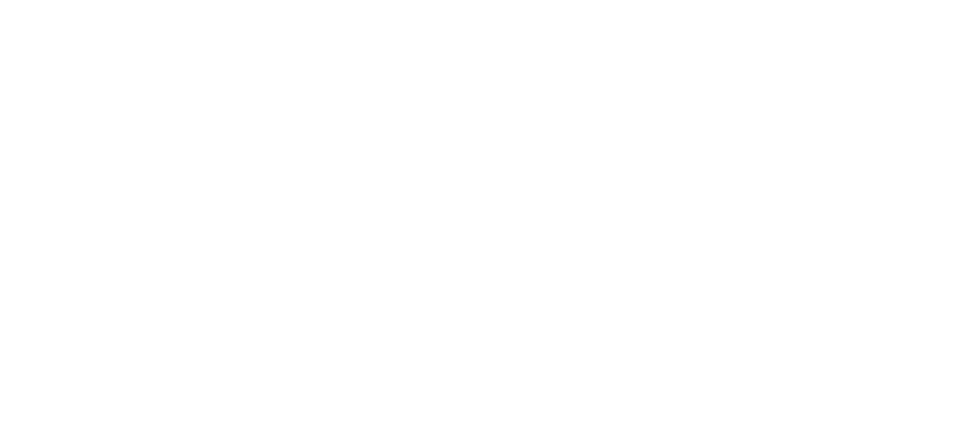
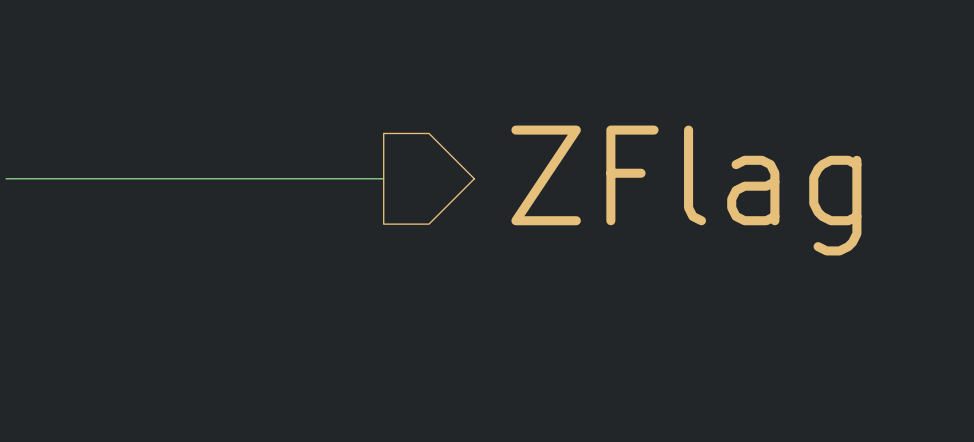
wire: none -> (6, 178) (383, 178)
hierarchical label: none -> ZFlag (686, 190)

